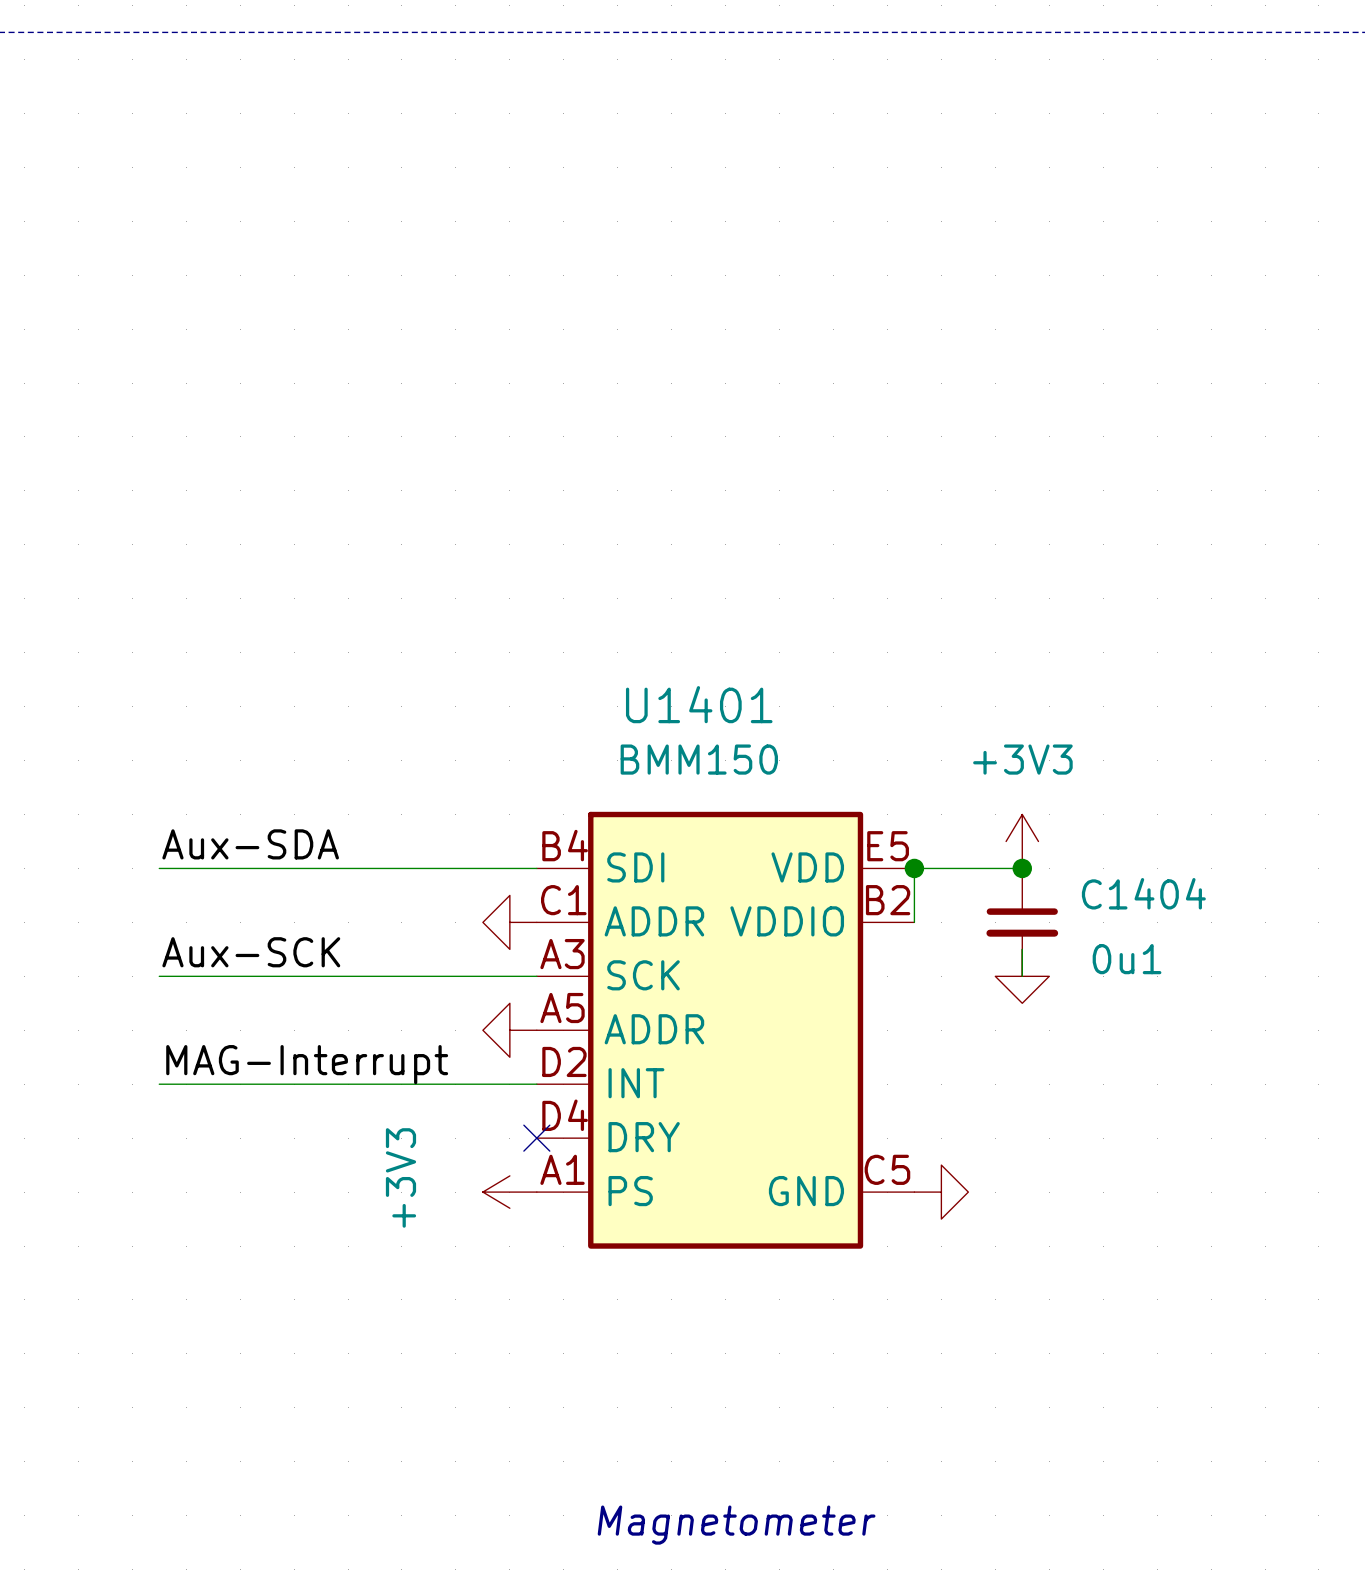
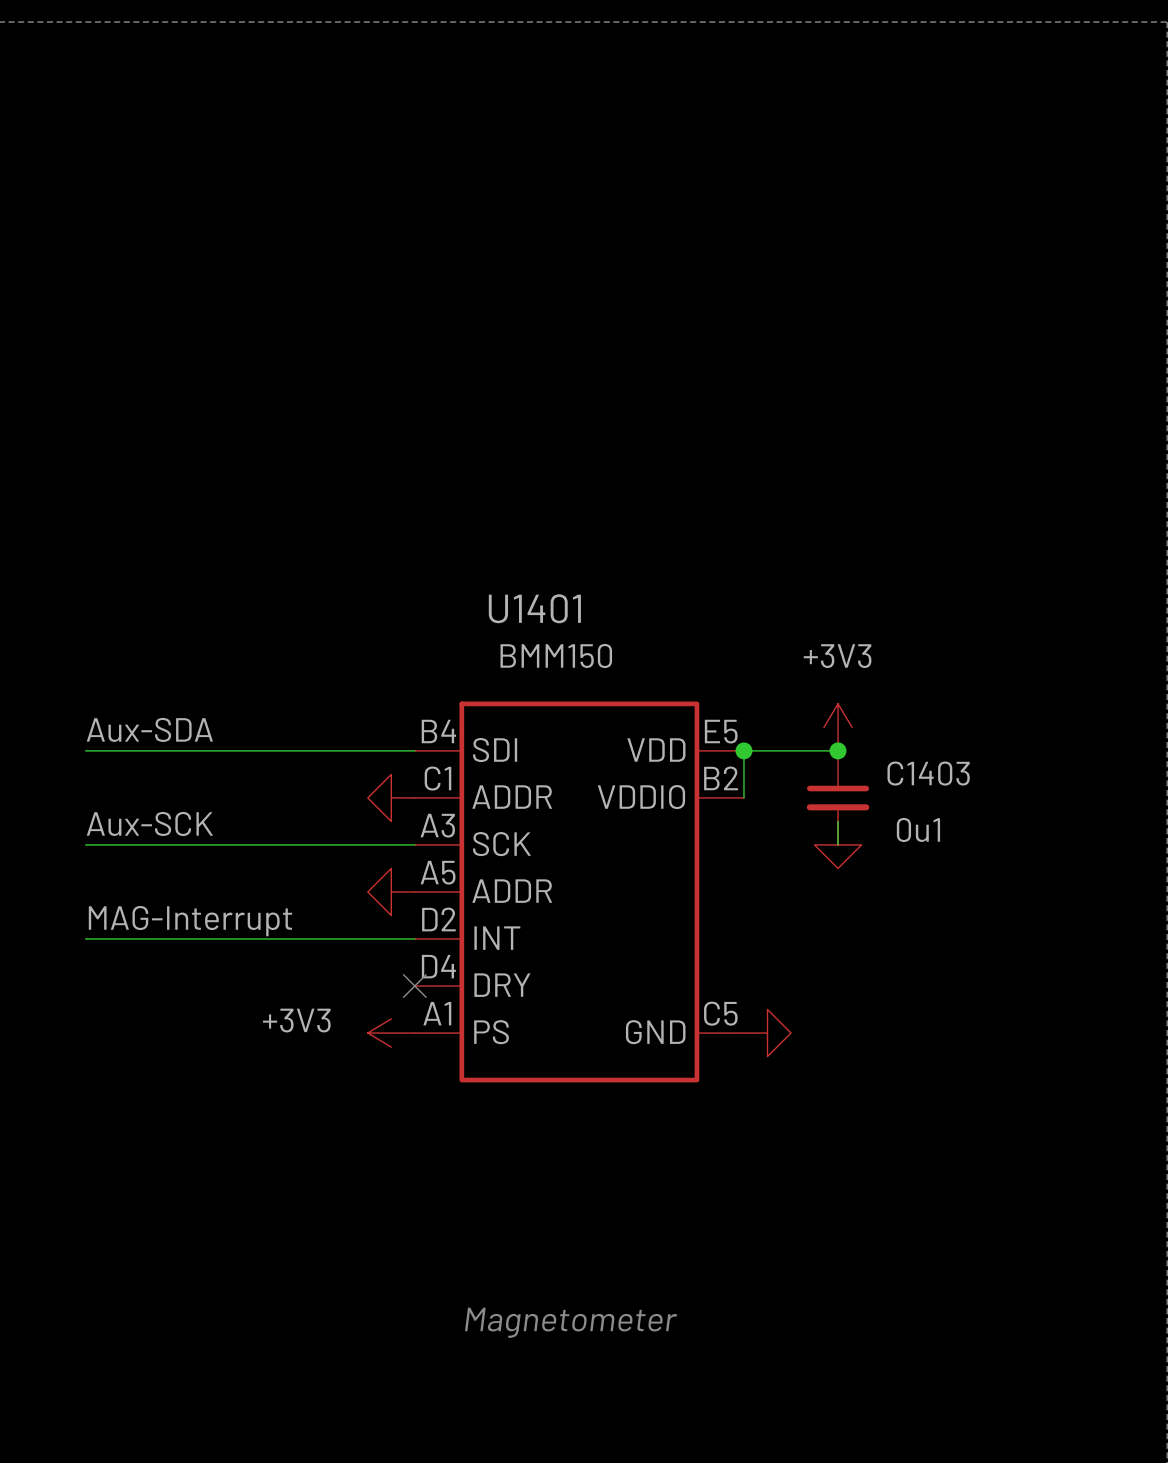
C1404 name: C1404 (1143, 893) -> C1403 (928, 773)
power symbol text rotation: 0° (400, 1177) -> 90° clockwise (296, 1020)

